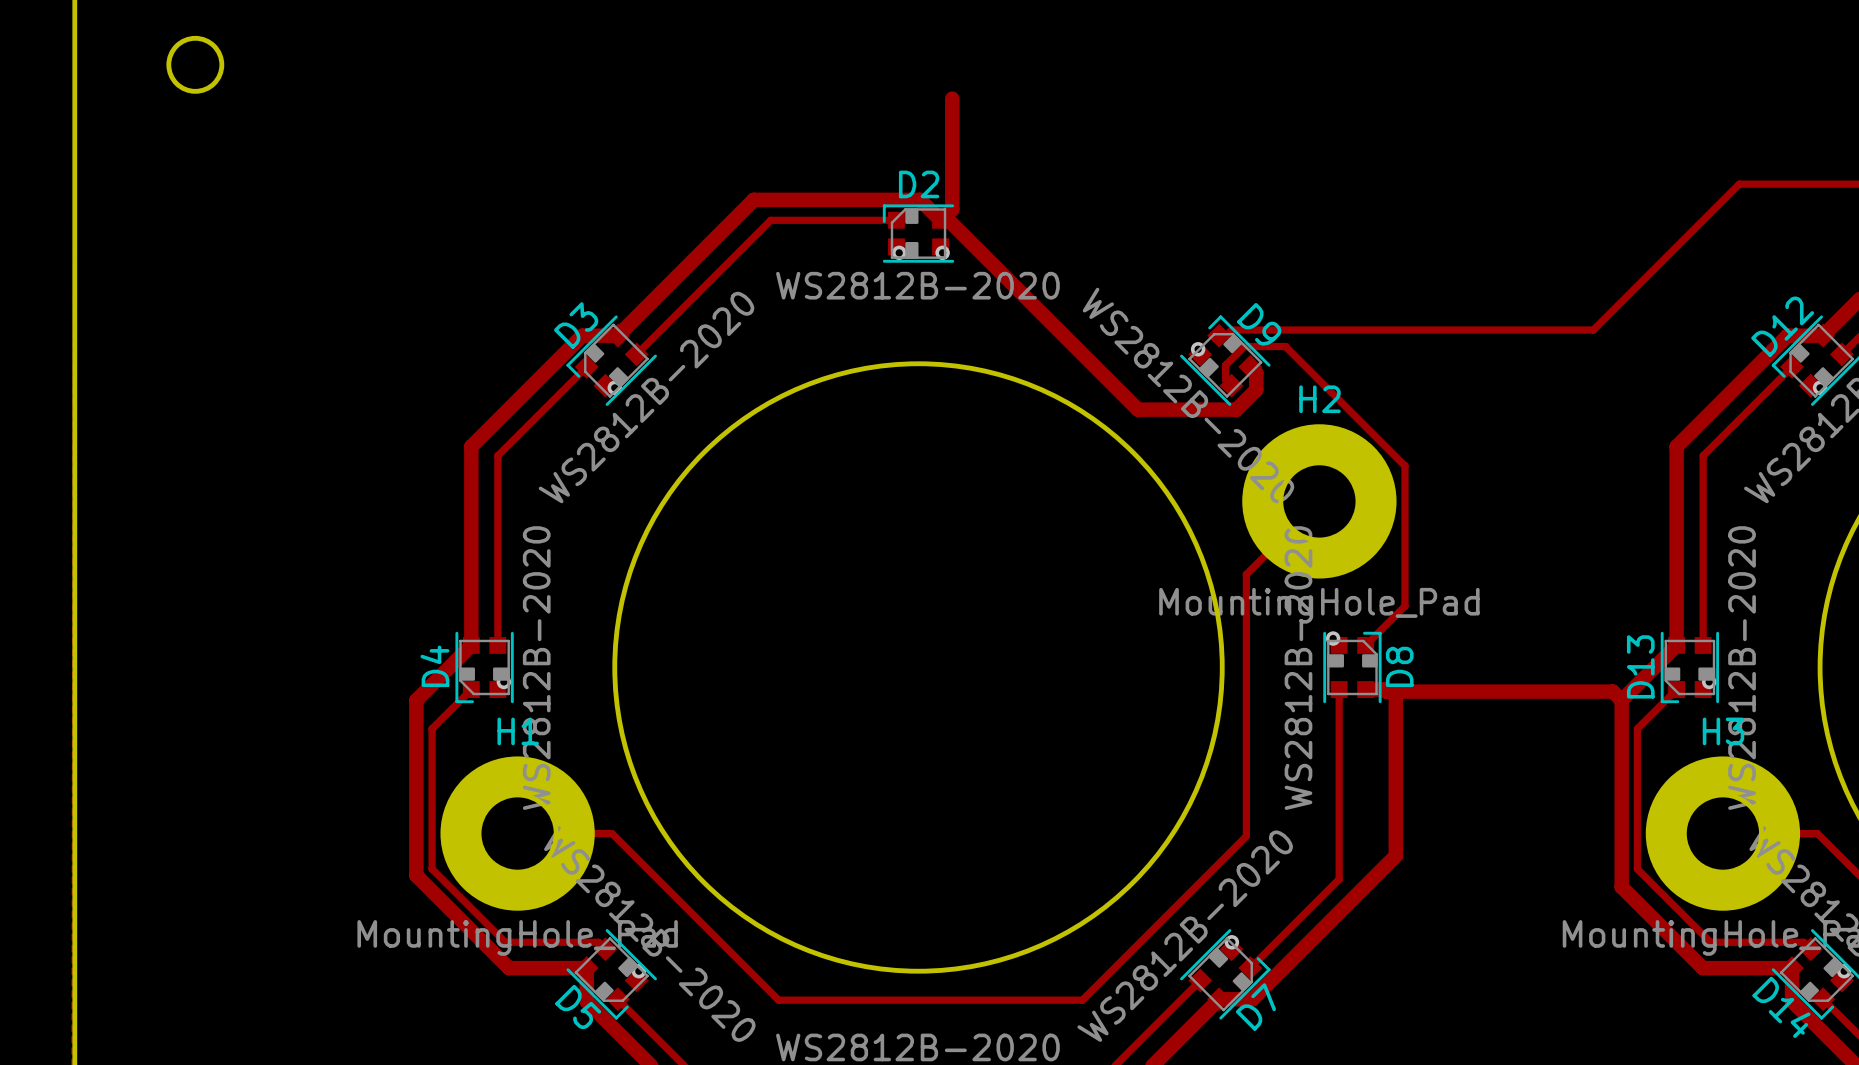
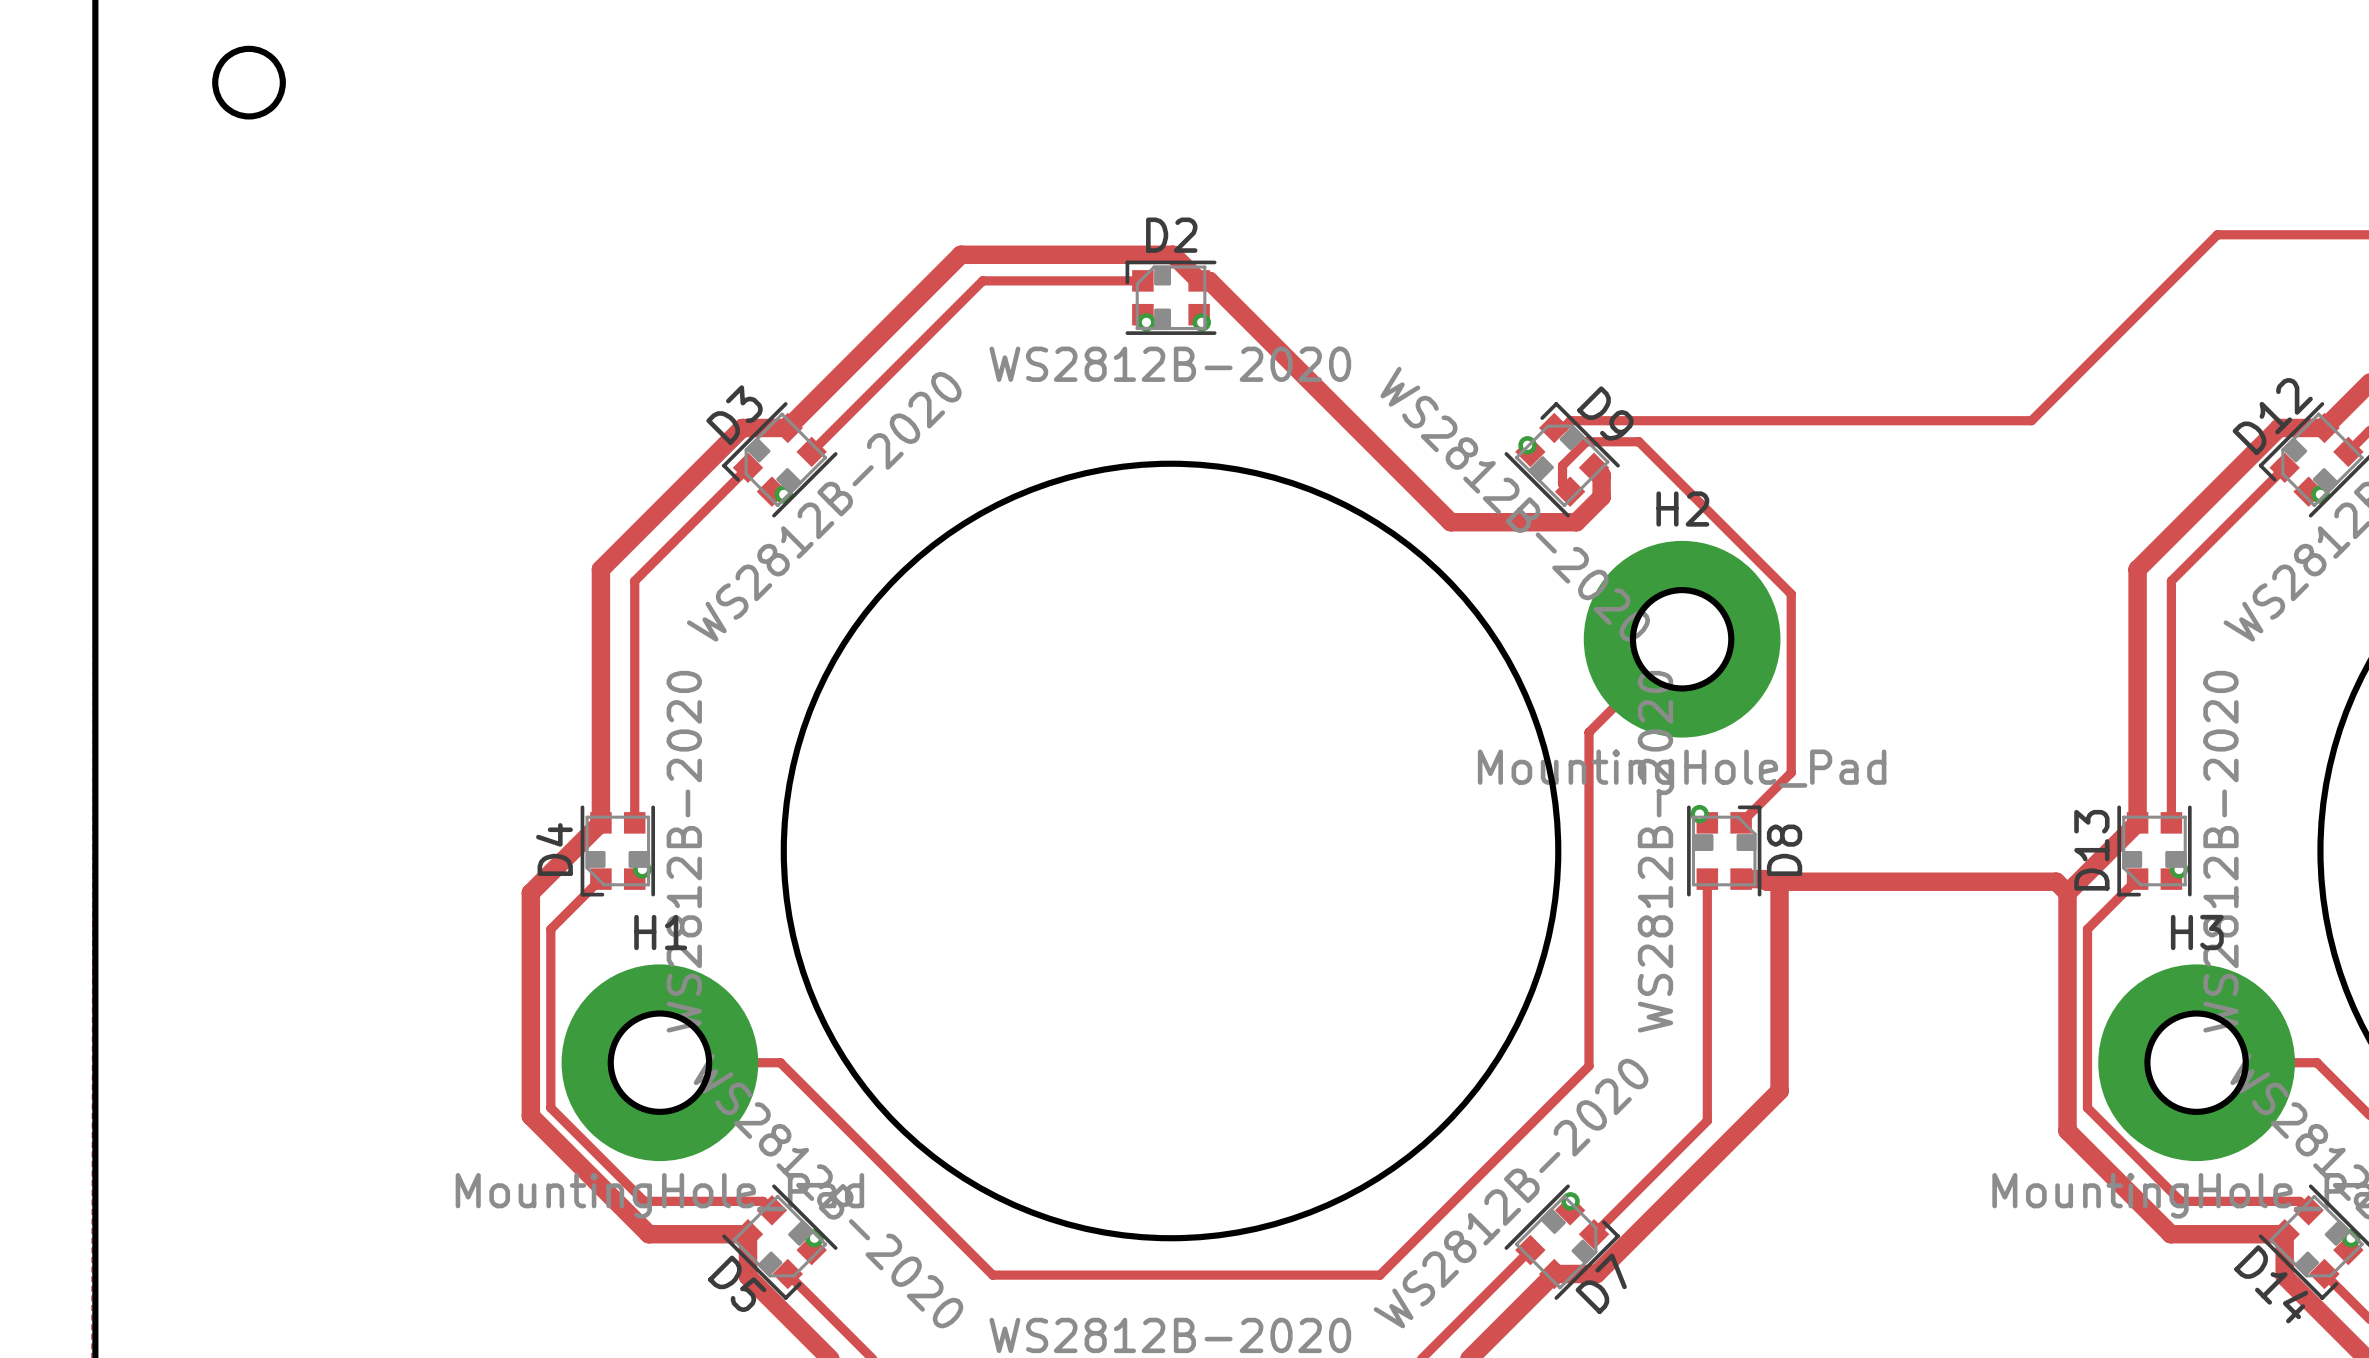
track: (952, 98) (952, 209) (941, 220) -> none

